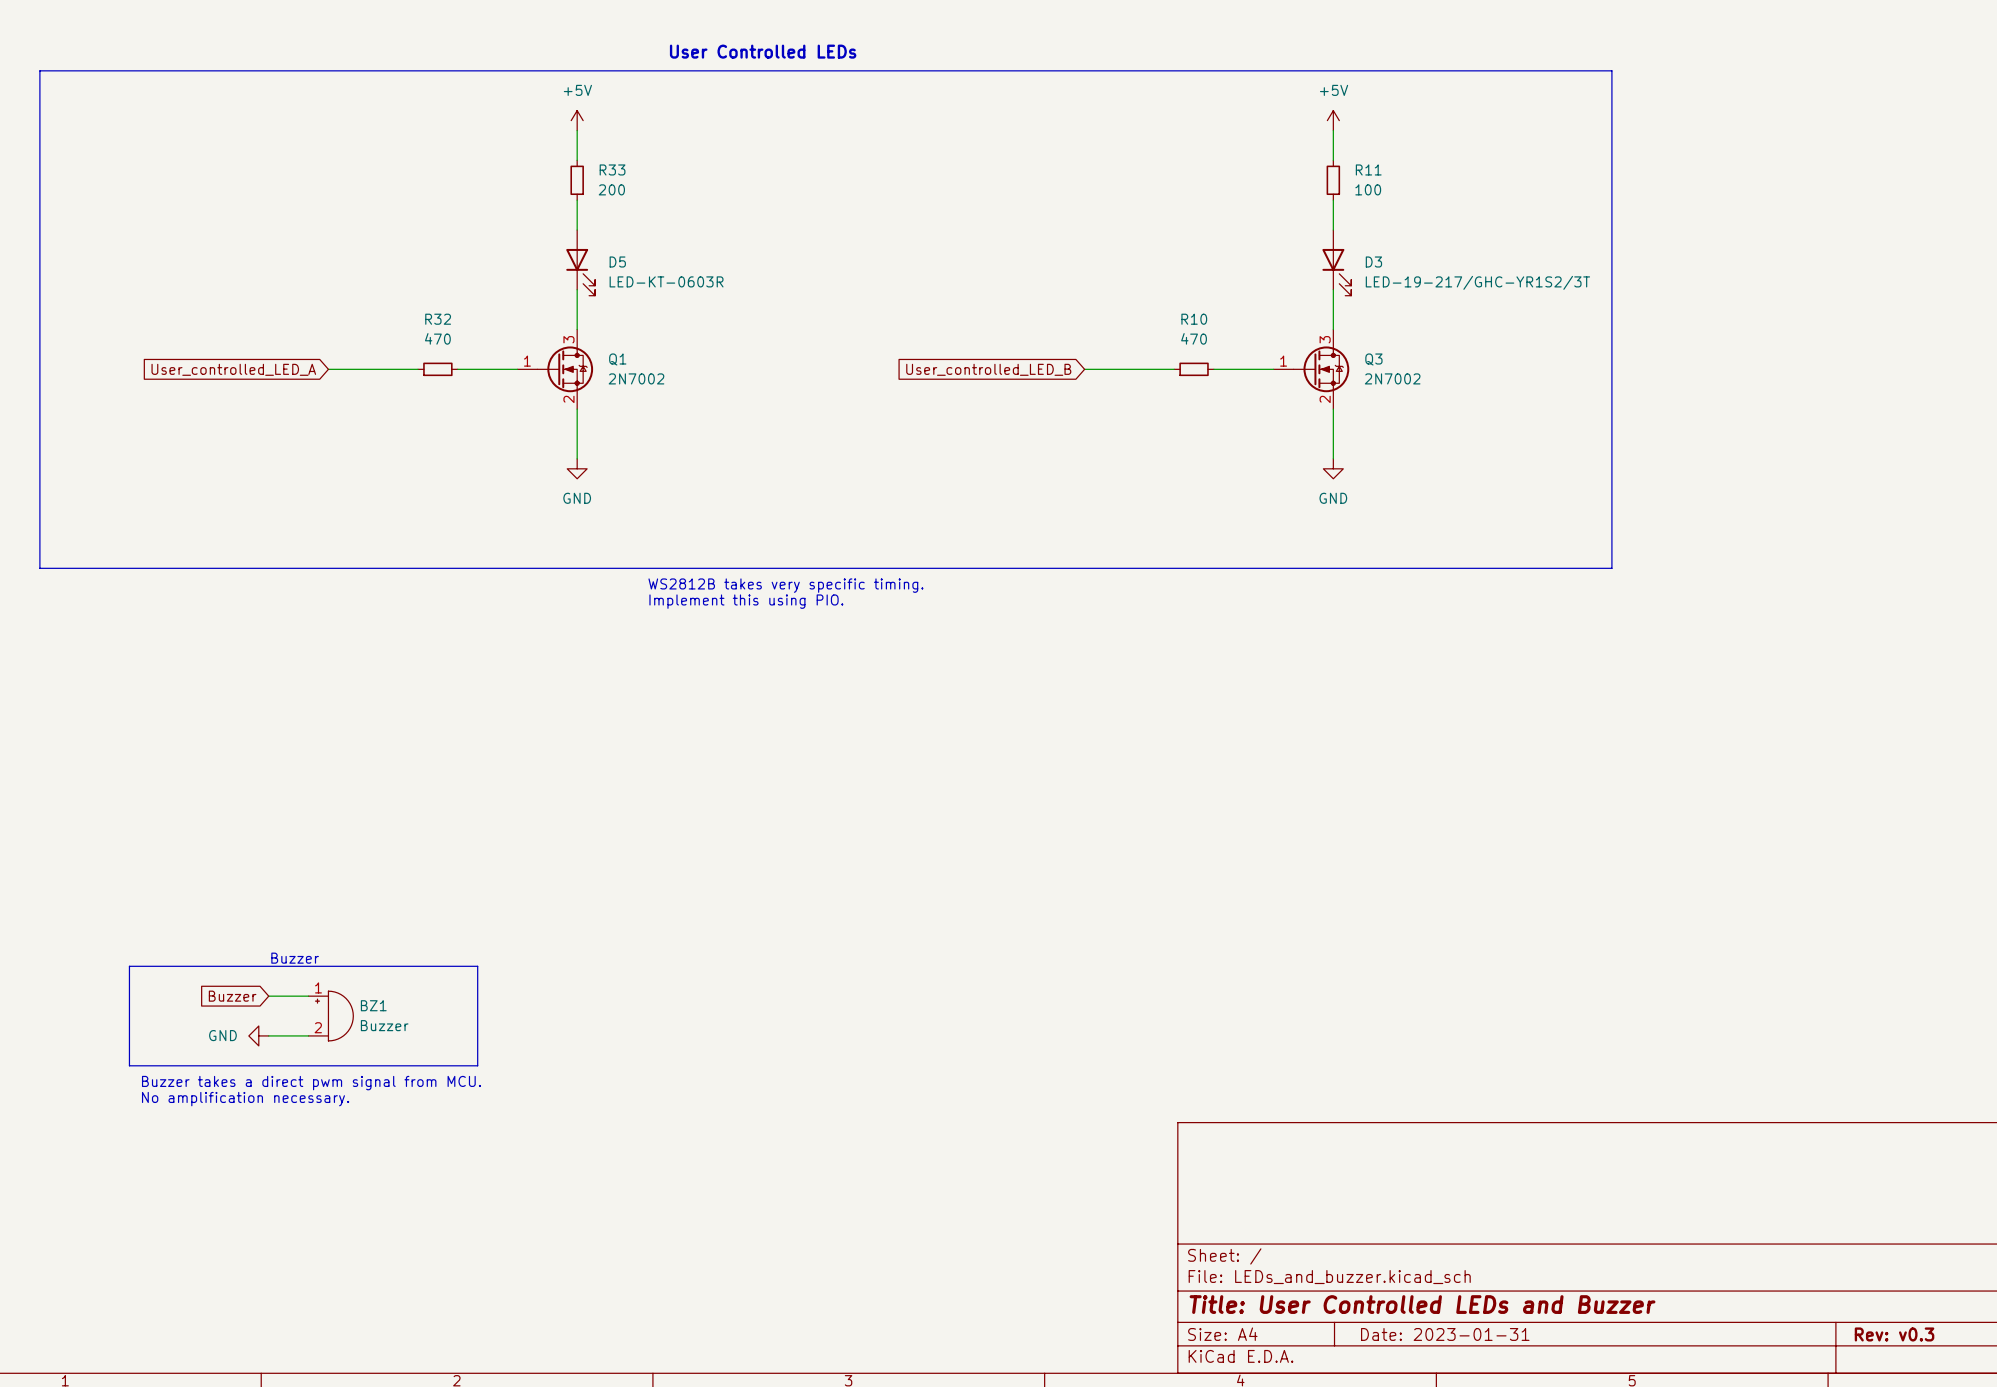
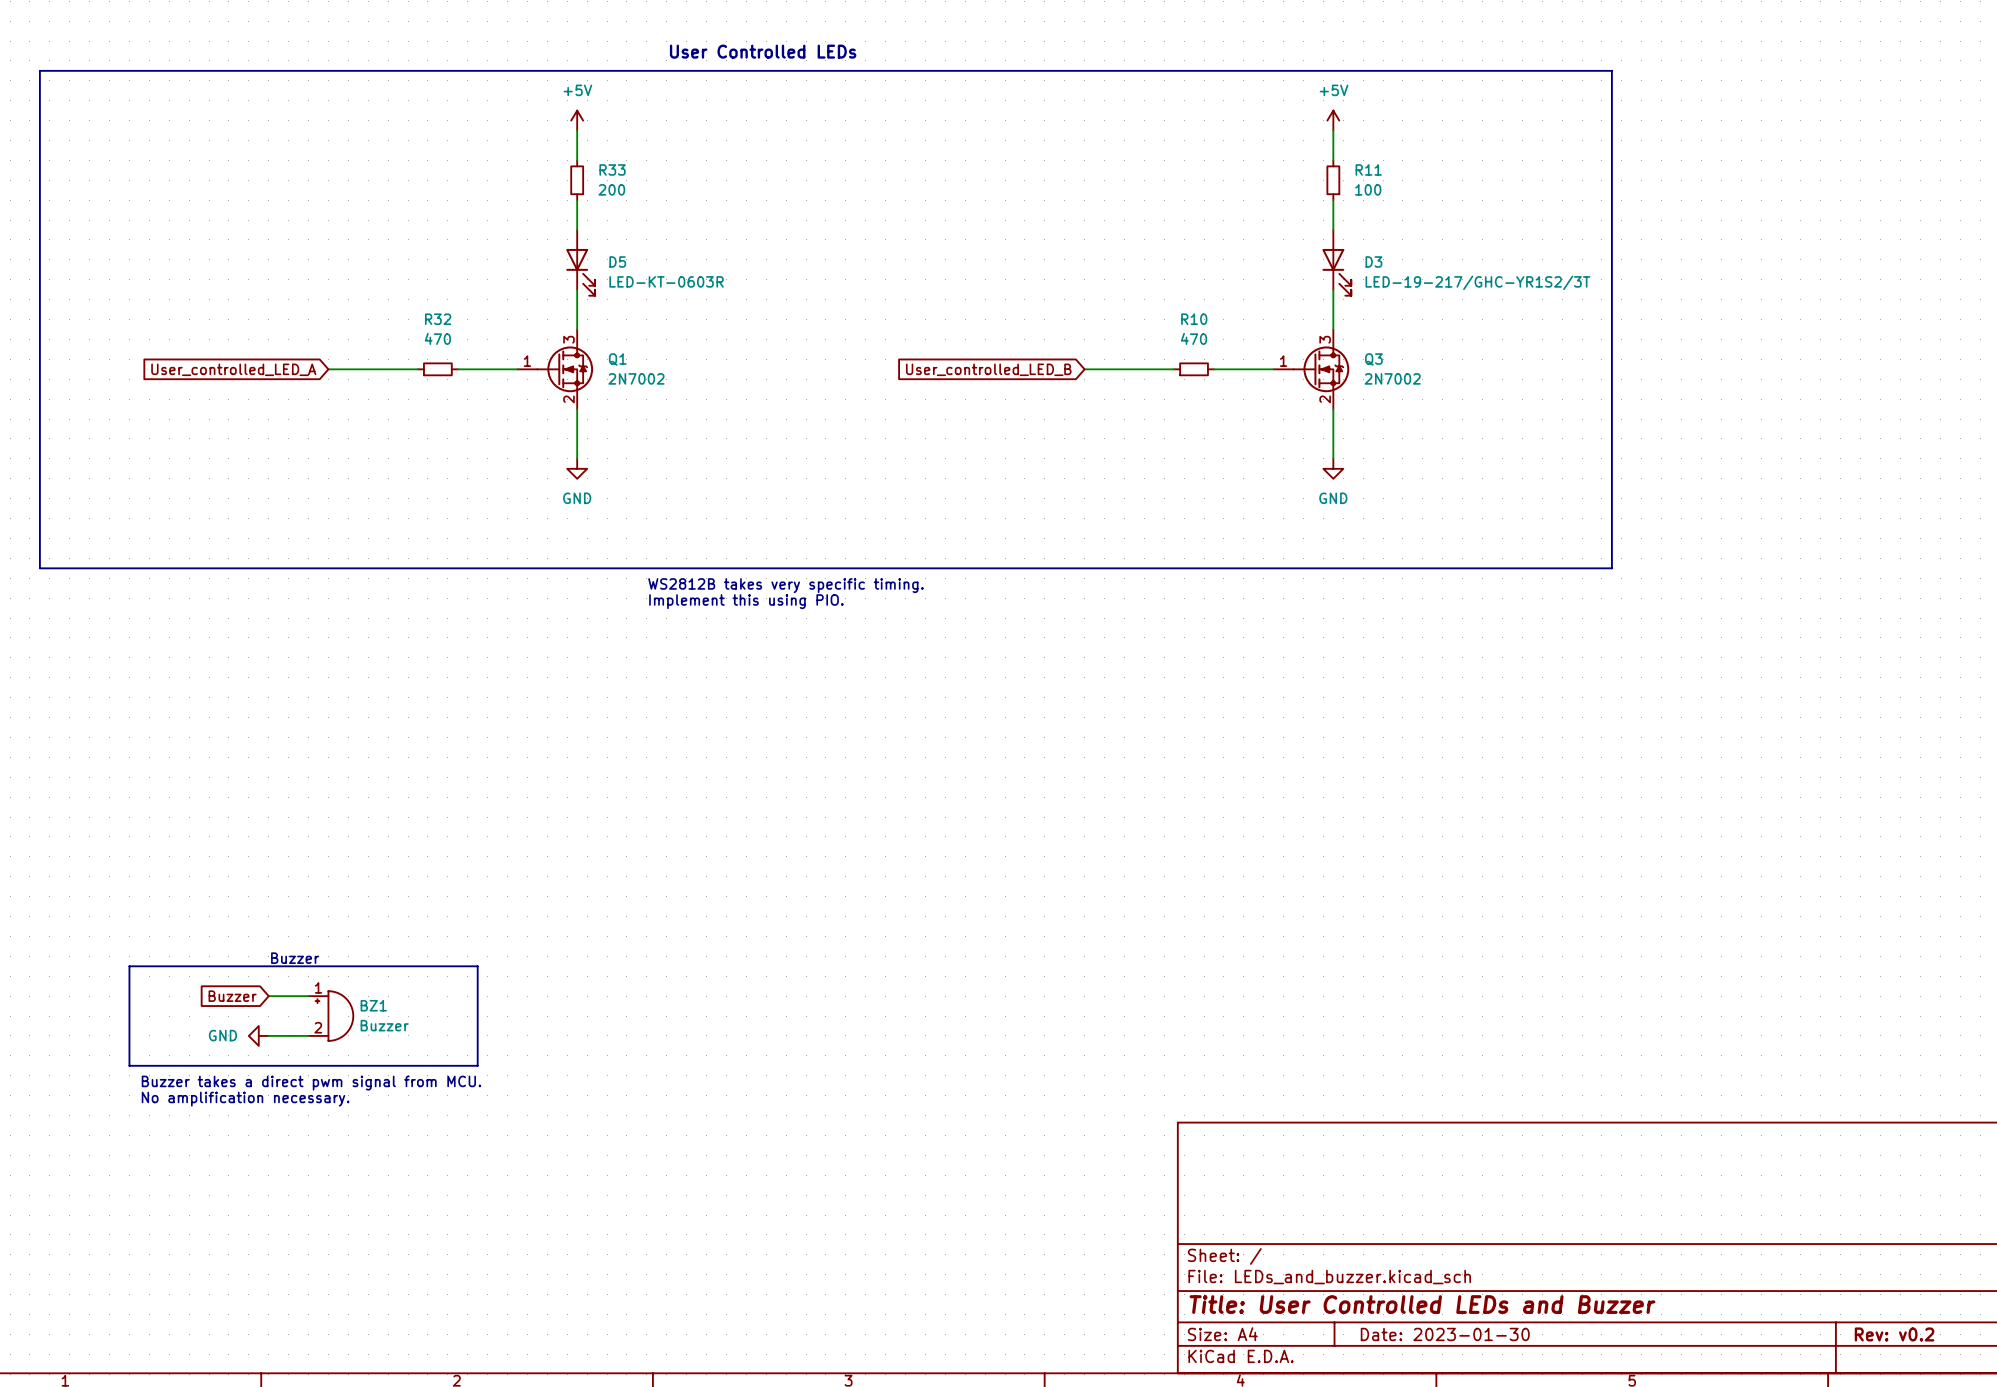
title block: Date: 2023-01-31 (1445, 1334) -> Date: 2023-01-30 (1445, 1334)
title block: Rev: v0.3 (1894, 1334) -> Rev: v0.2 (1894, 1334)

